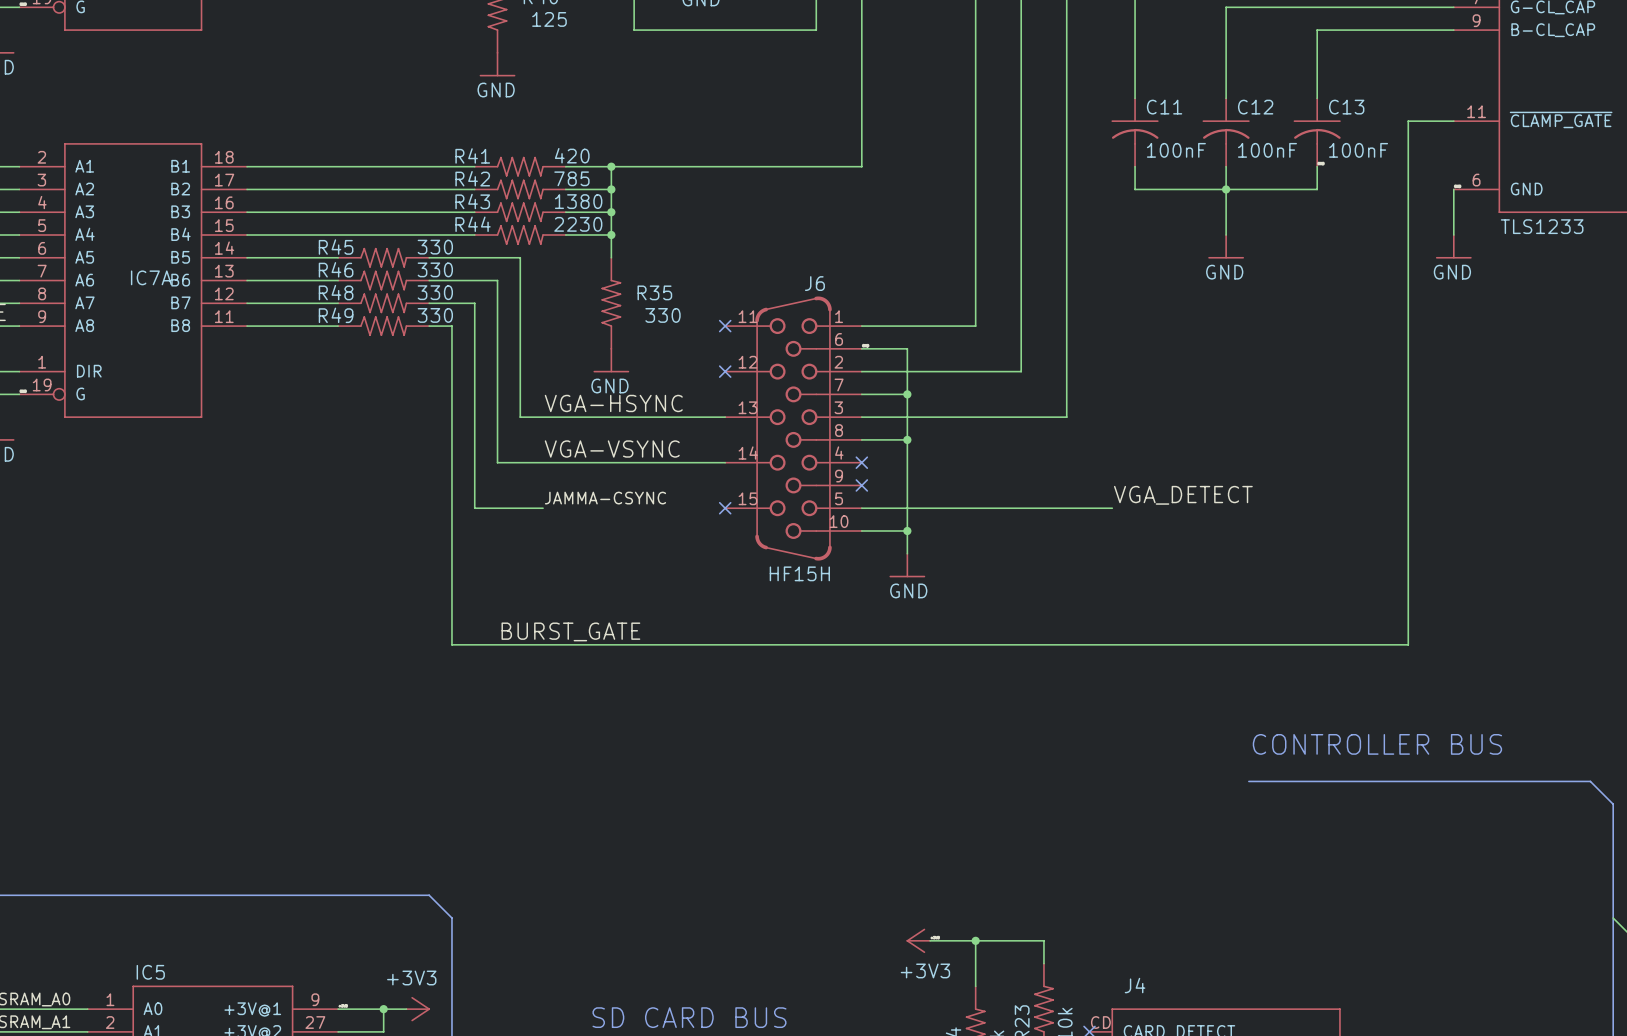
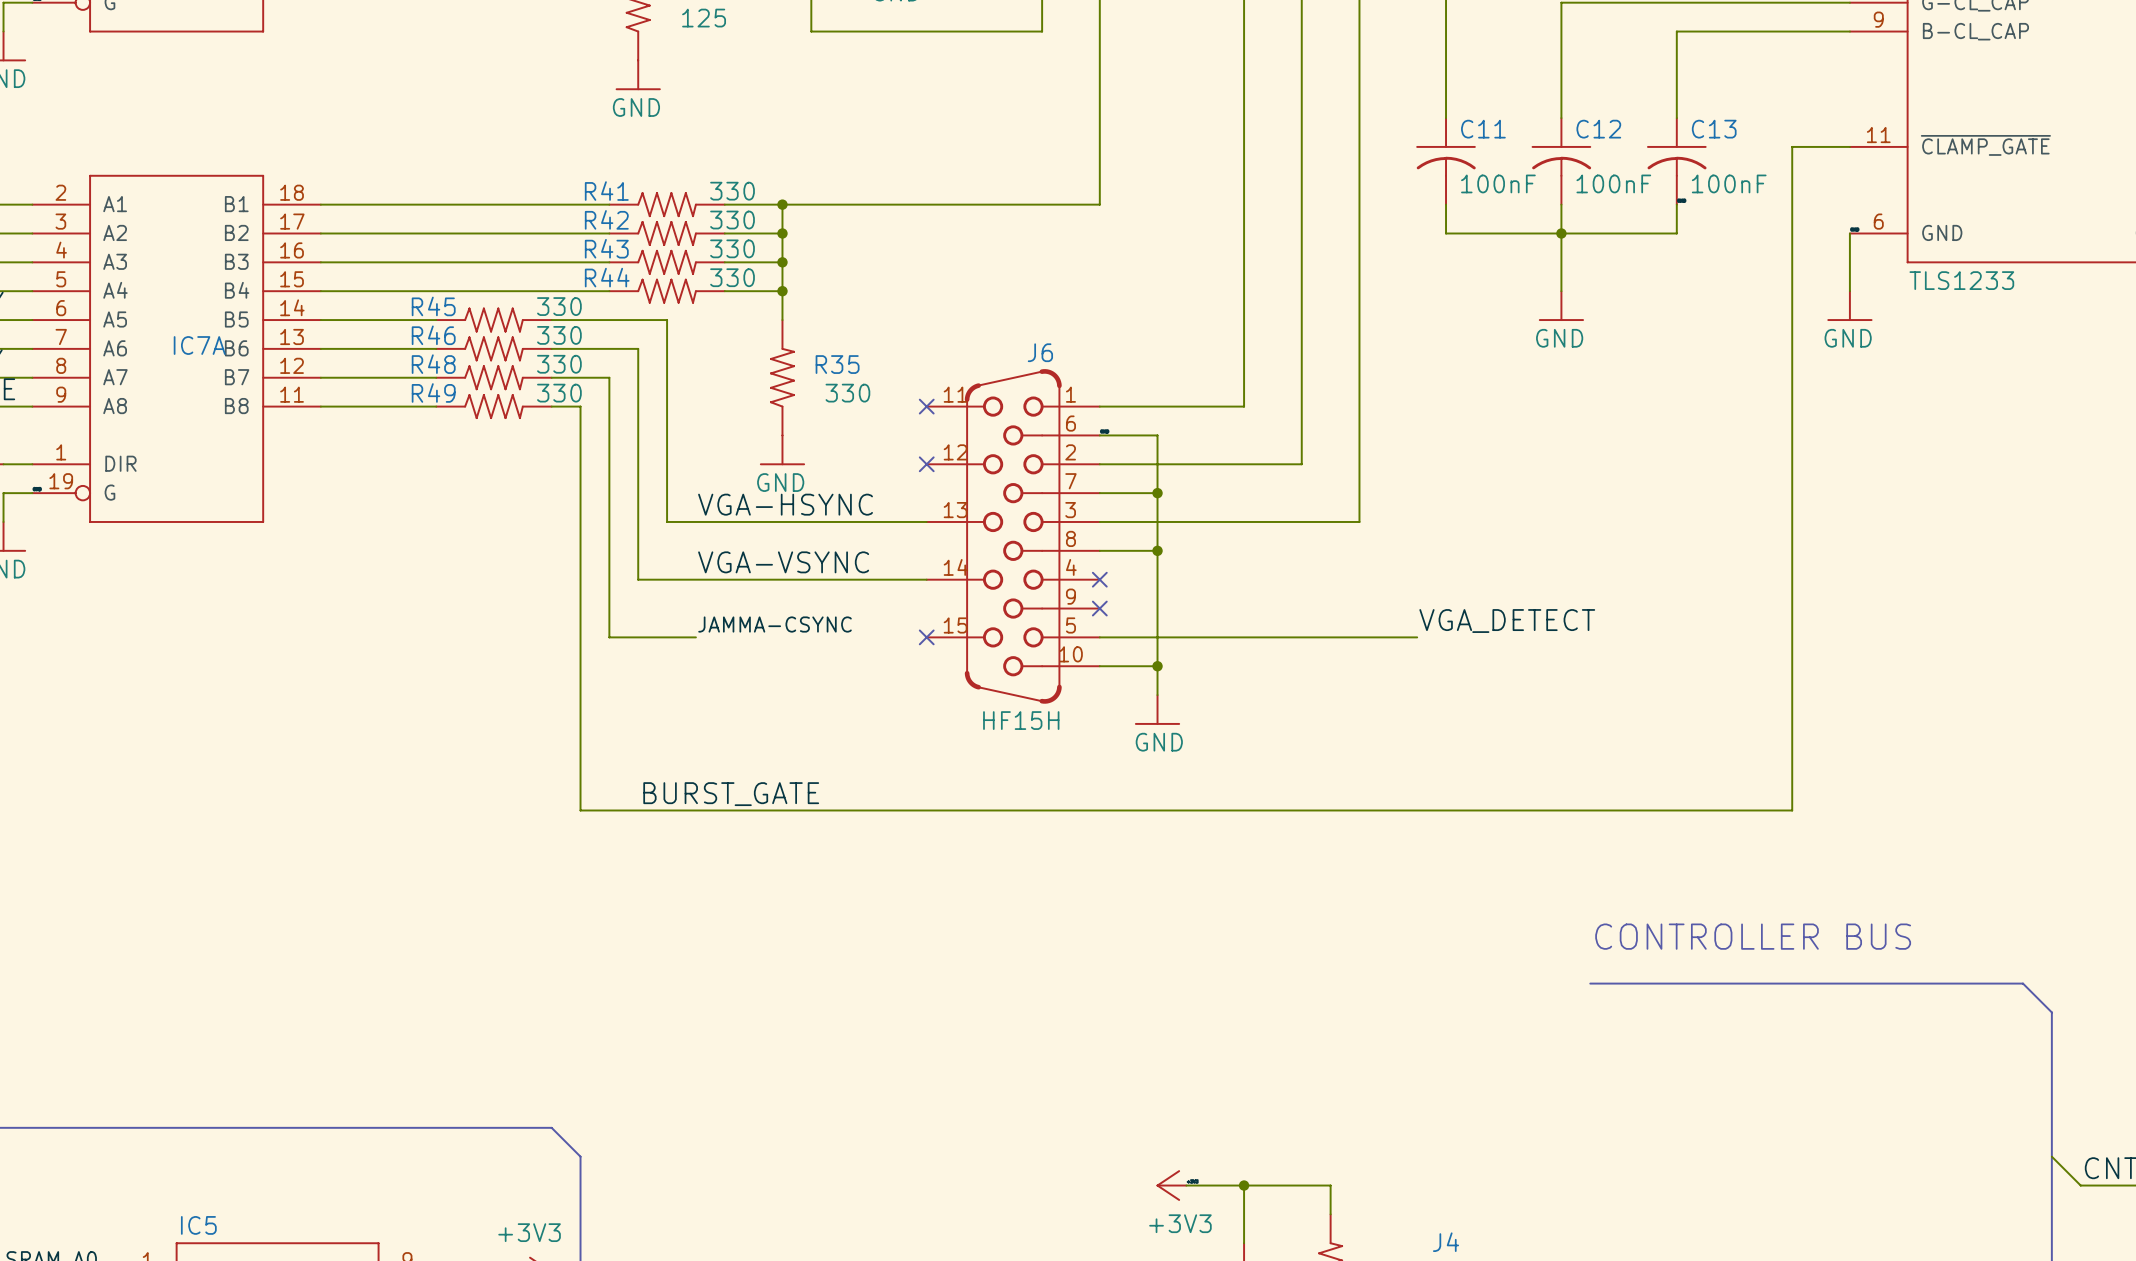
R41 value: 420 (572, 155) -> 330 (732, 191)
R42 value: 785 (571, 178) -> 330 (732, 220)
R43 value: 1380 (578, 201) -> 330 (732, 248)
R44 value: 2230 (578, 224) -> 330 (732, 277)

